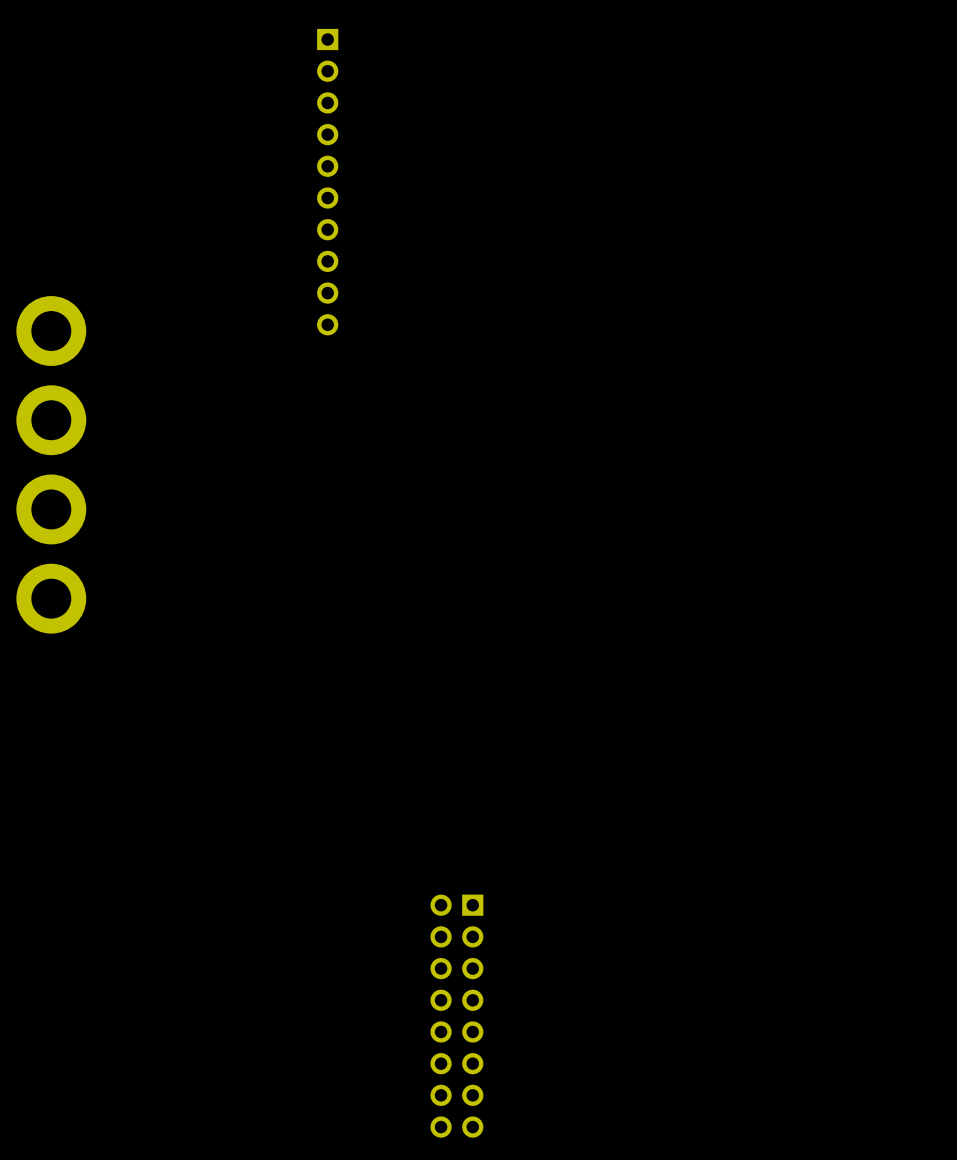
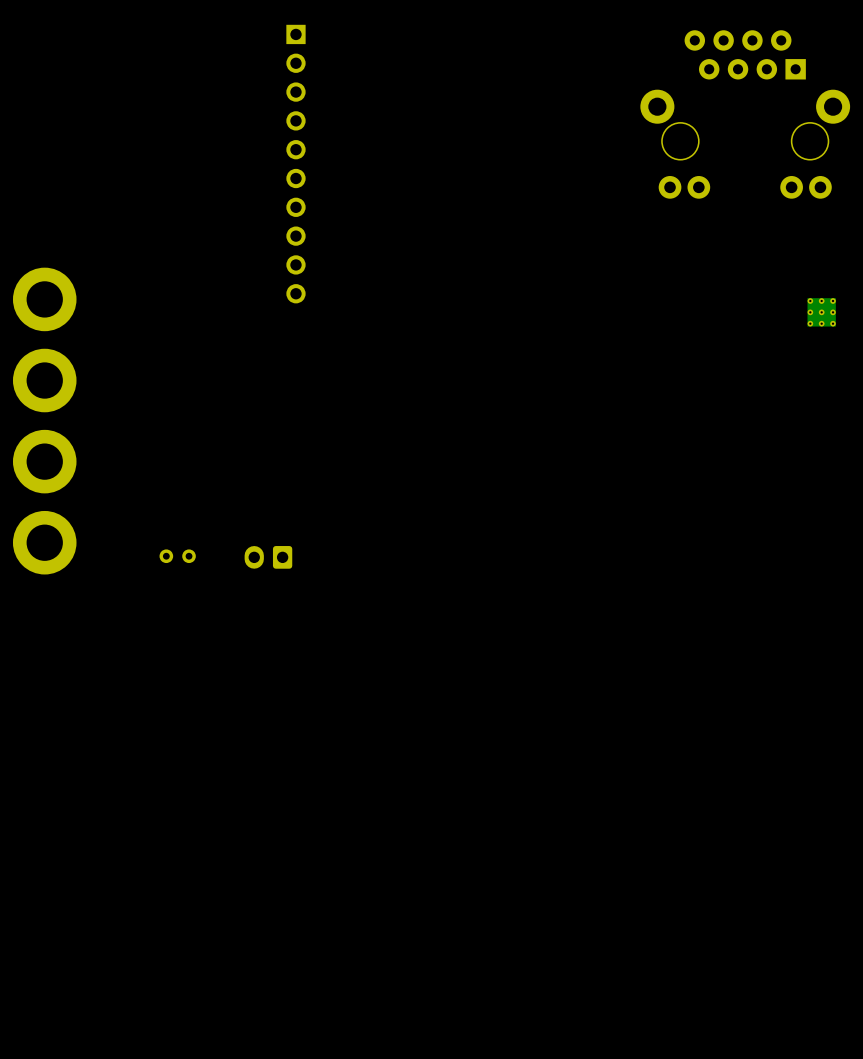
part: none -> (745, 114)
part: none -> (821, 312)
part: none -> (177, 556)
part: none -> (268, 557)
part: (456, 1016) -> none

